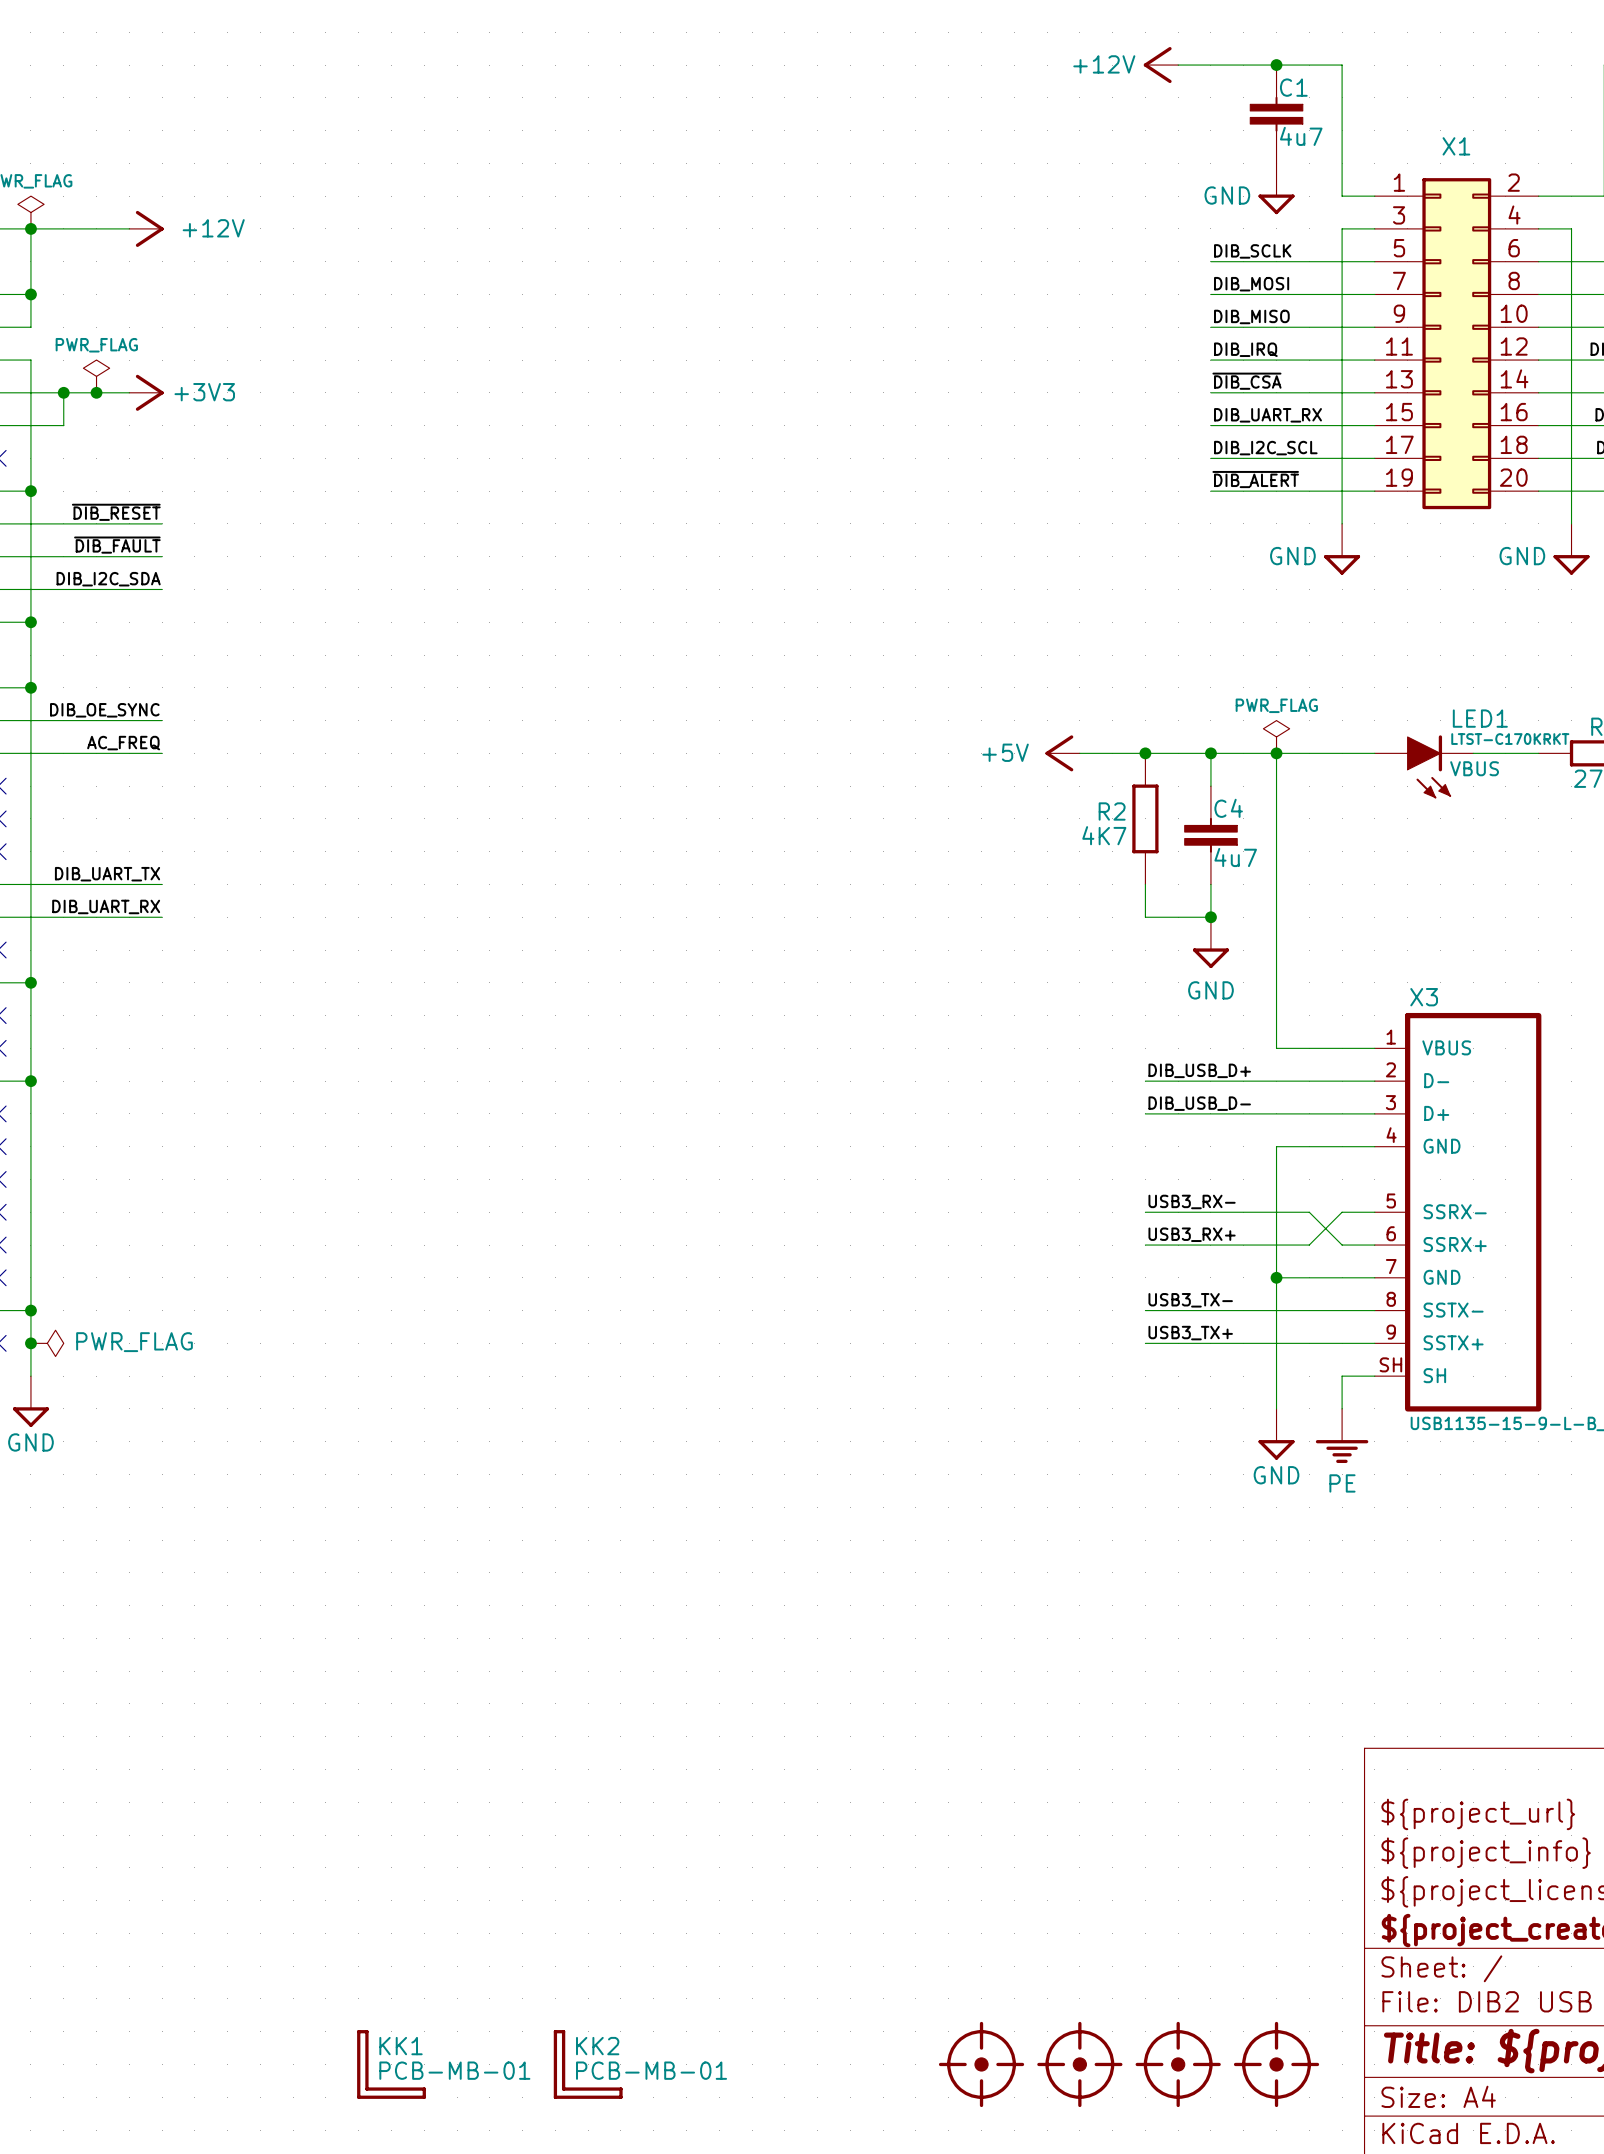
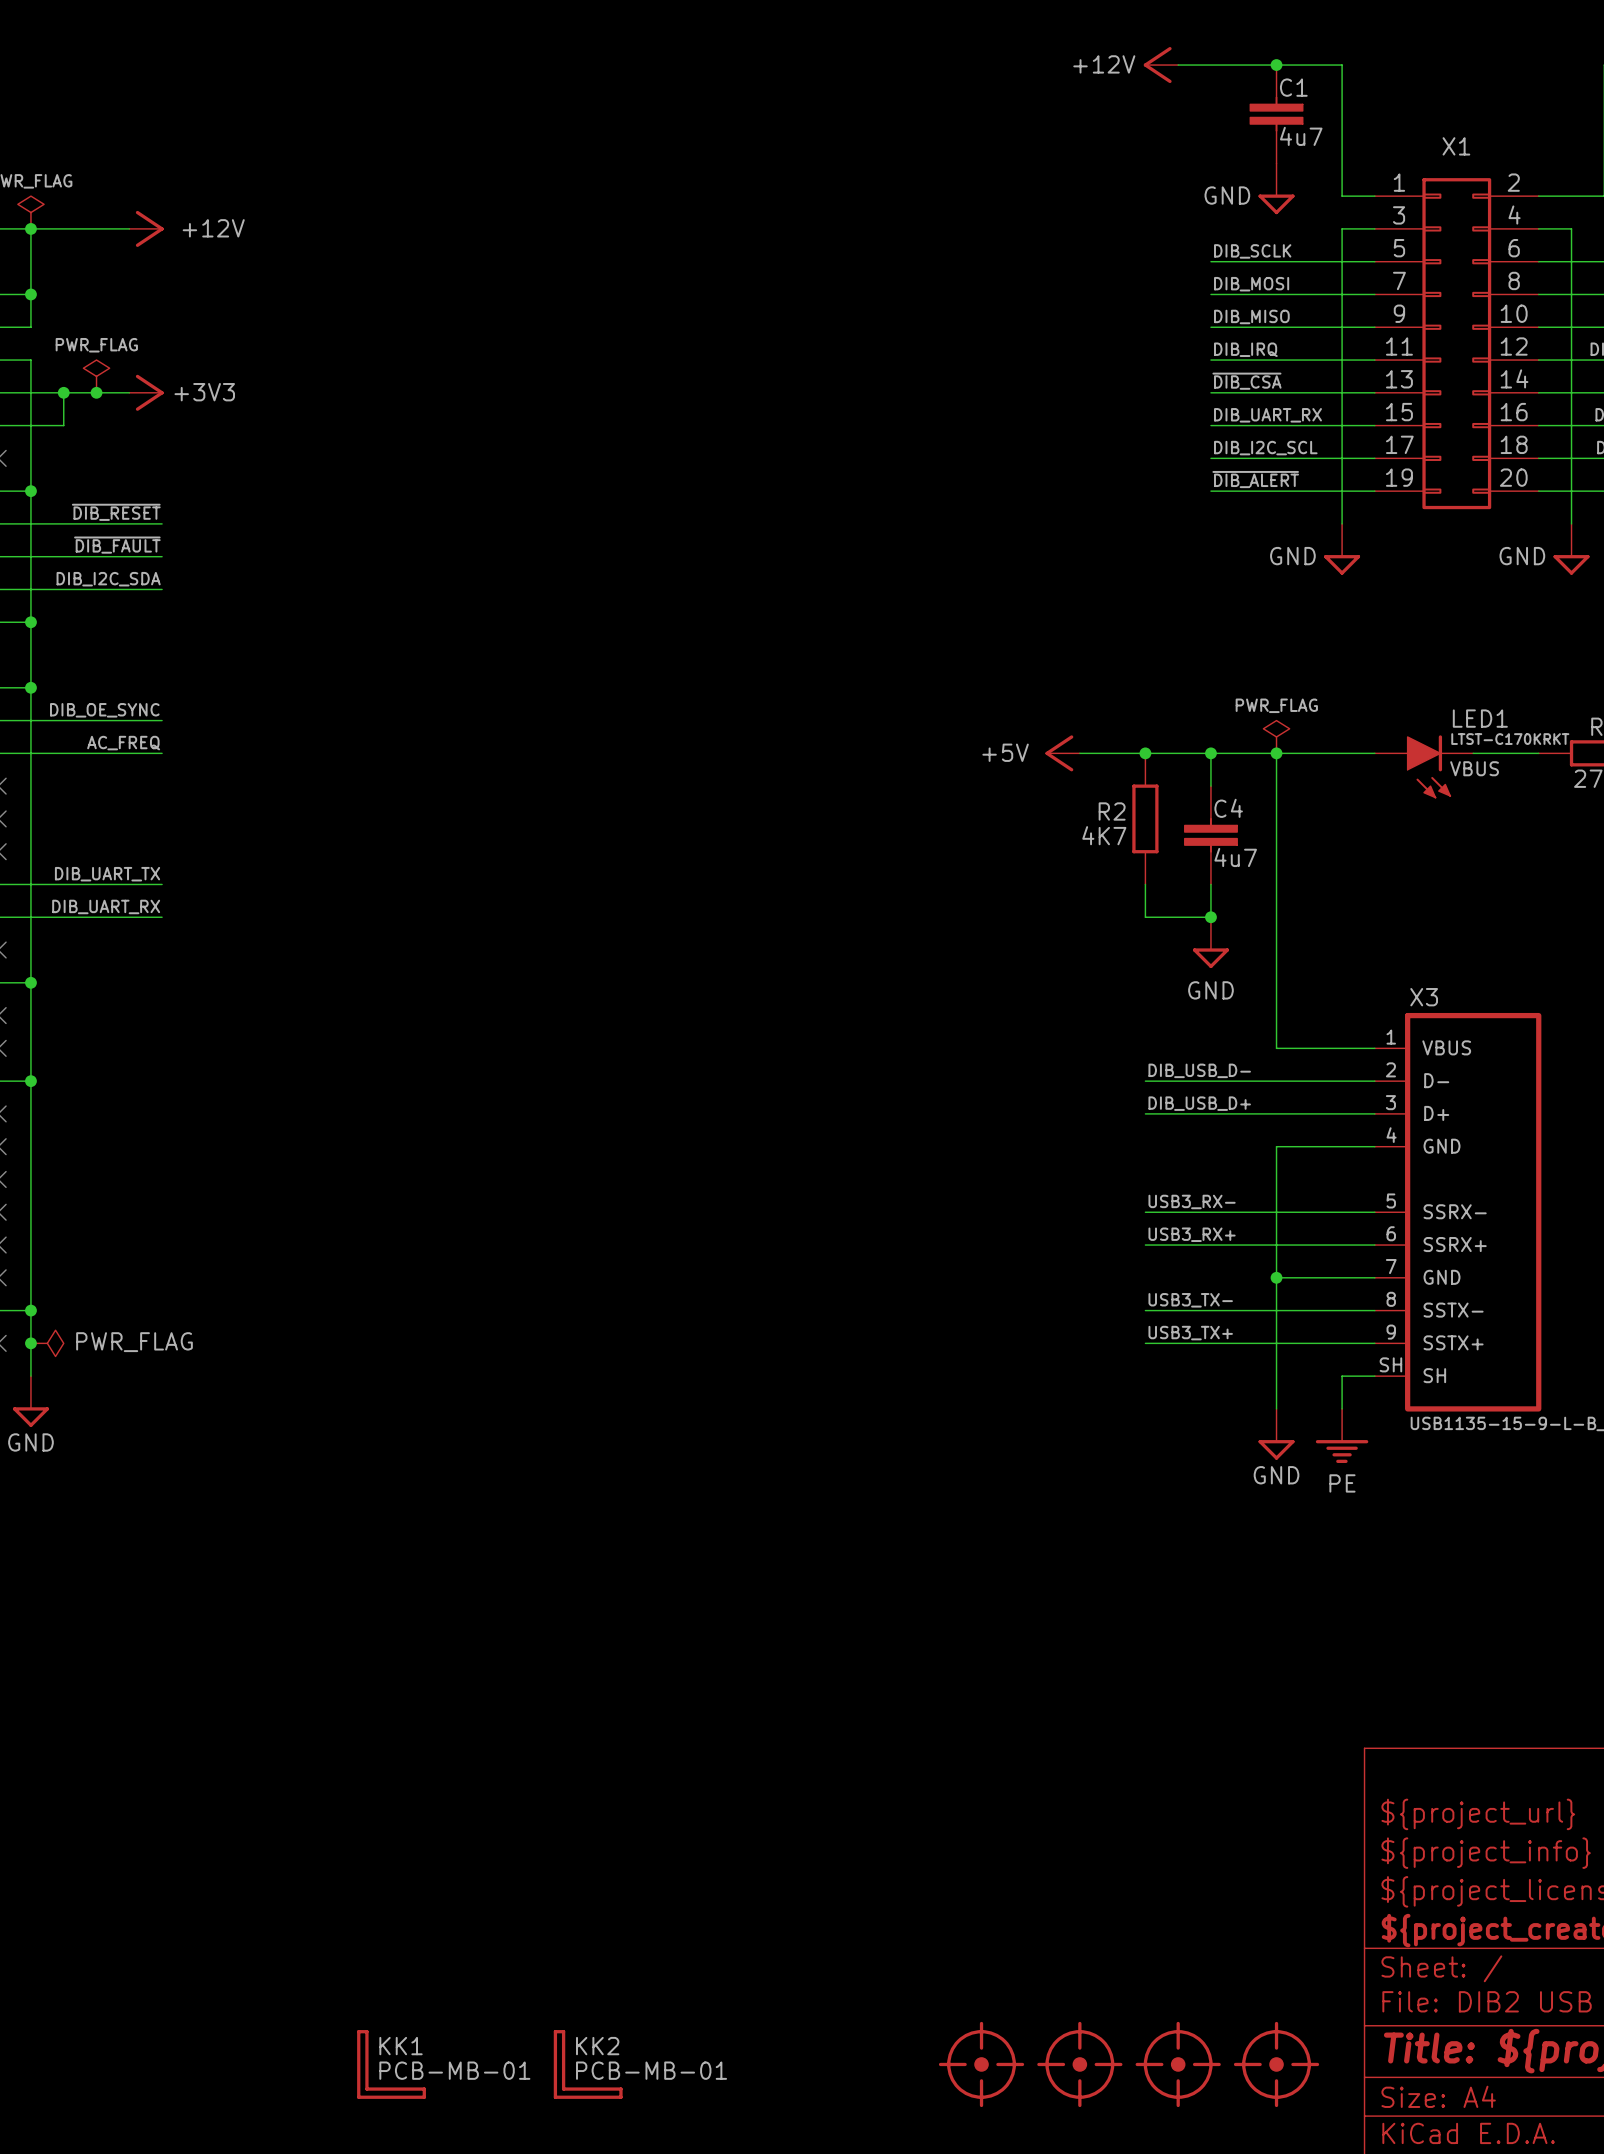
label: DIB_USB_D+ (1199, 1070) -> DIB_USB_D- (1199, 1070)
label: DIB_USB_D- (1199, 1103) -> DIB_USB_D+ (1199, 1103)
wire: (1309, 1212) (1342, 1245) -> (1309, 1212) (1342, 1212)
wire: (1342, 1212) (1309, 1245) -> (1342, 1245) (1309, 1245)

